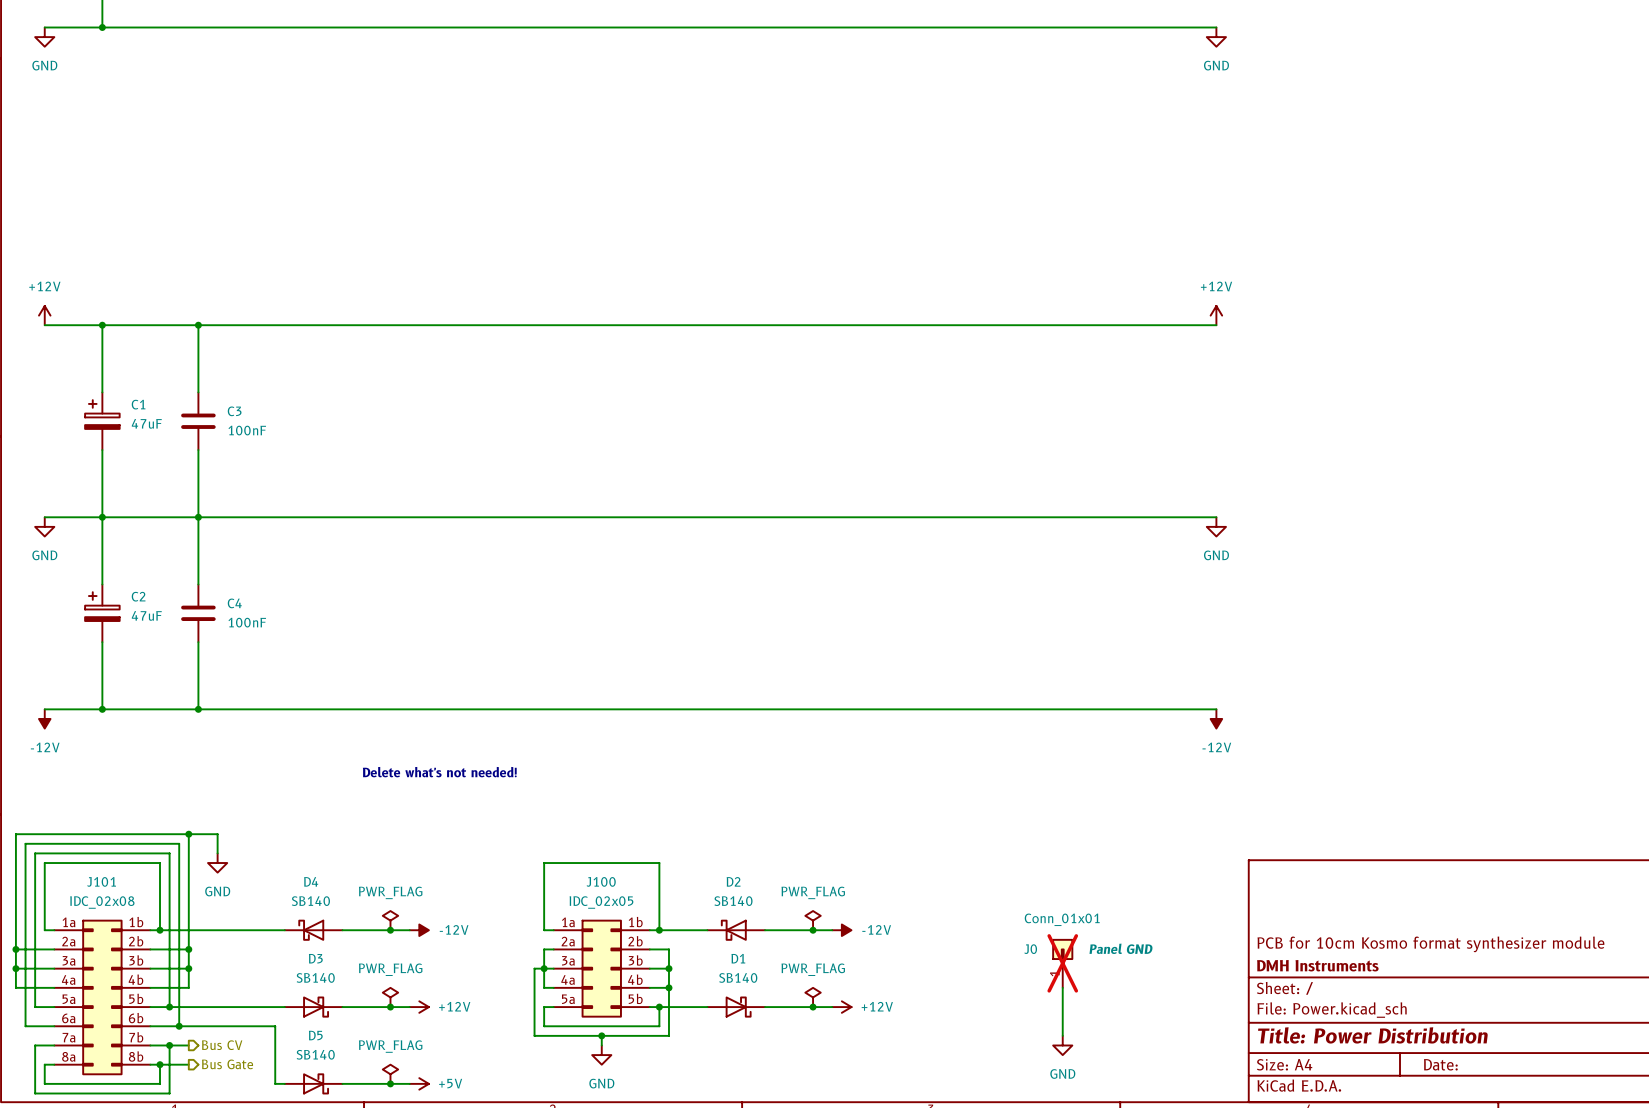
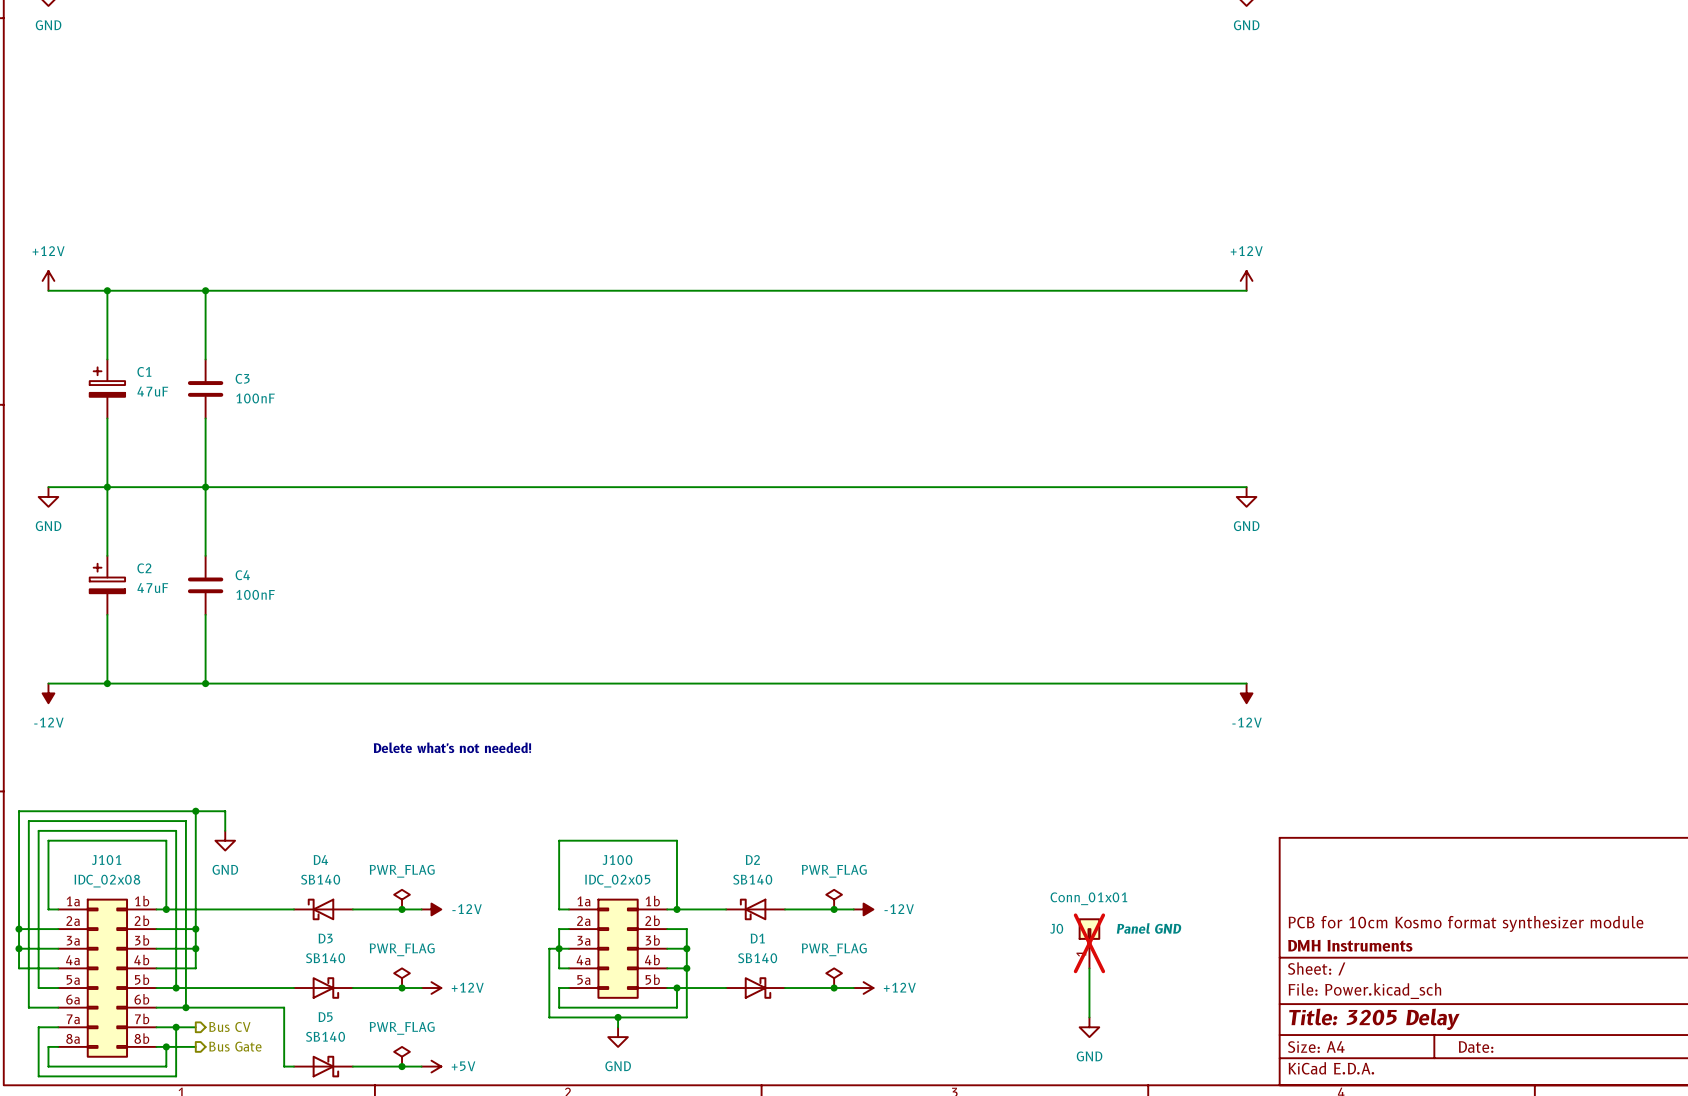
title block: Title: Power Distribution (1372, 1035) -> Title: 3205 Delay (1374, 1019)

